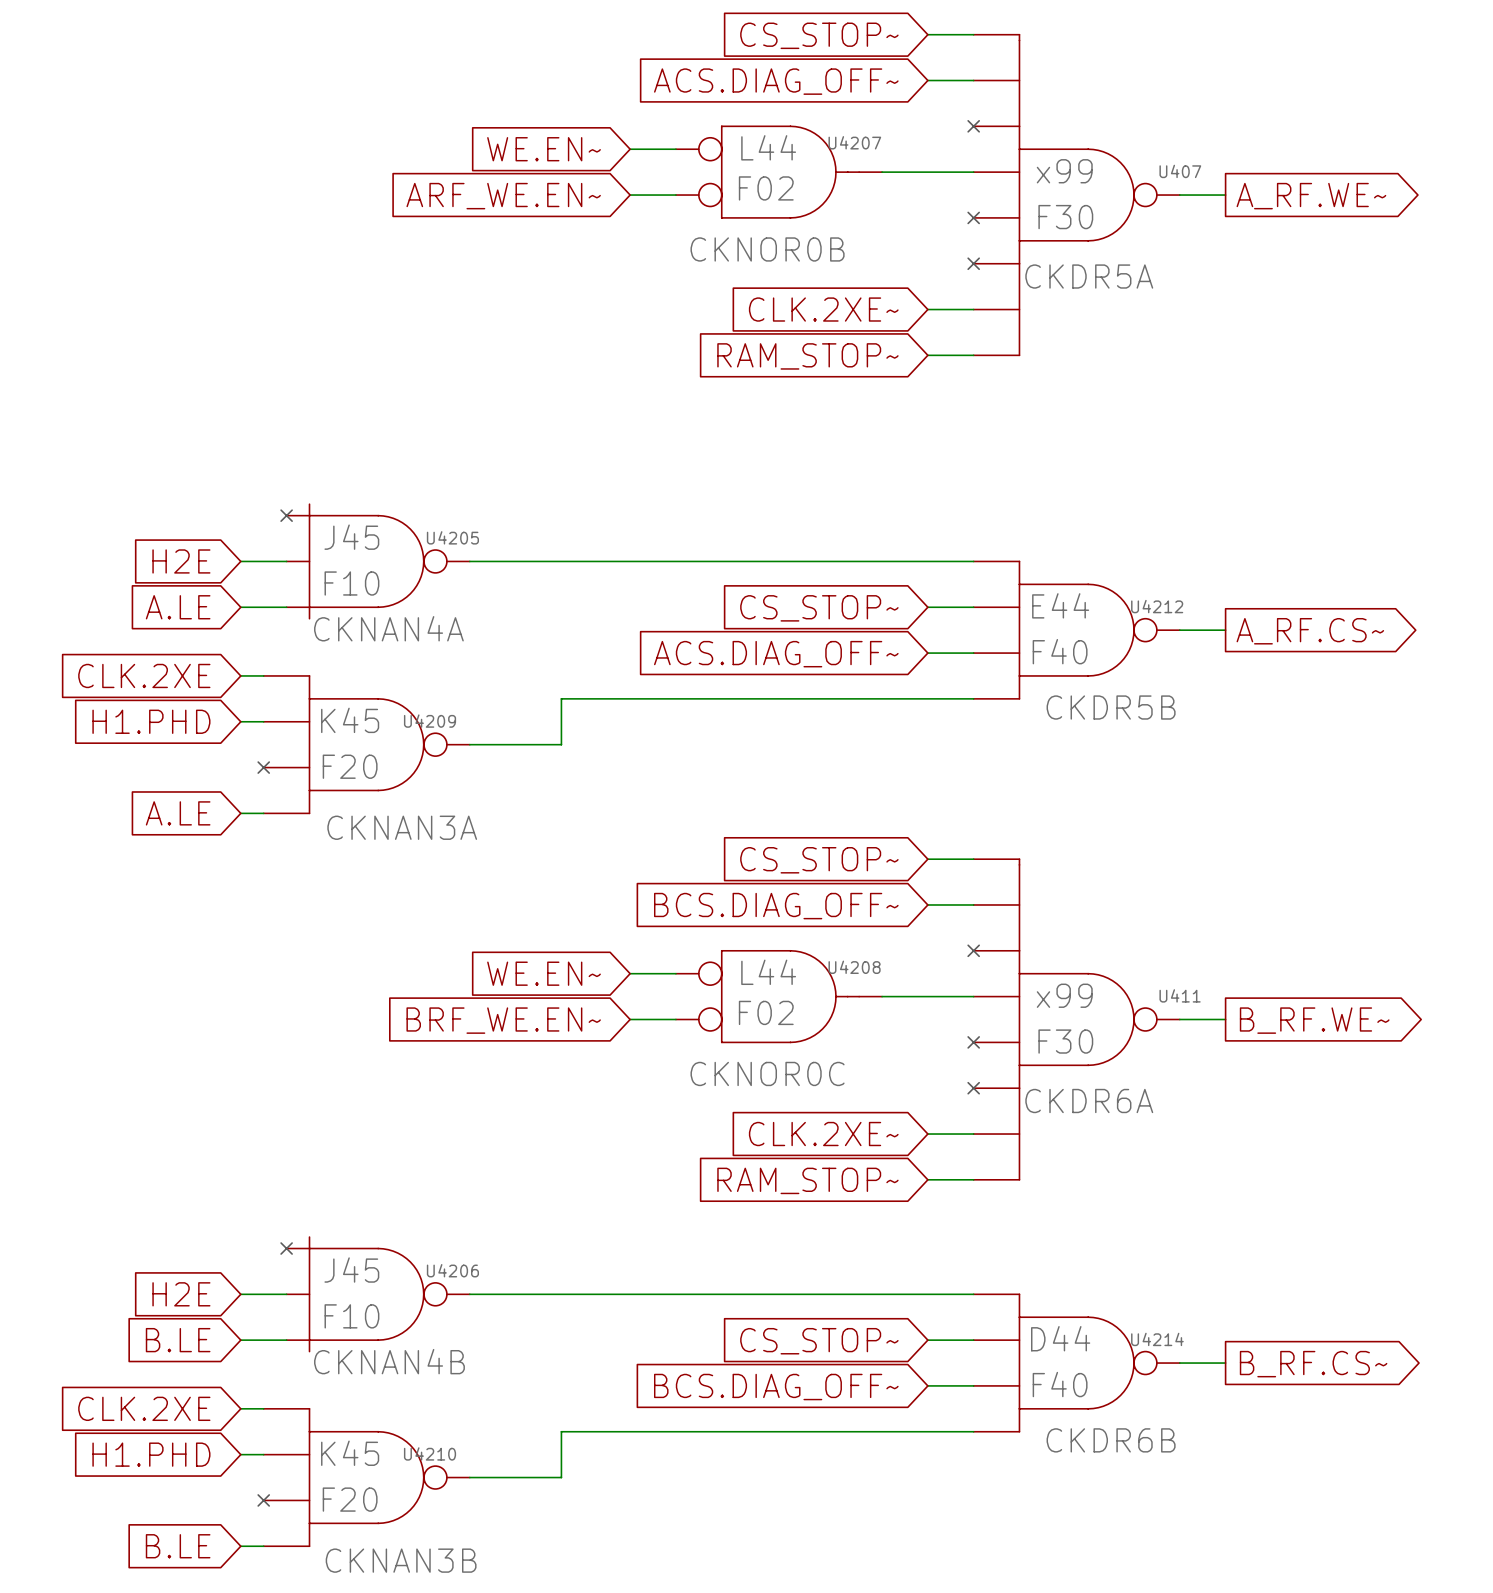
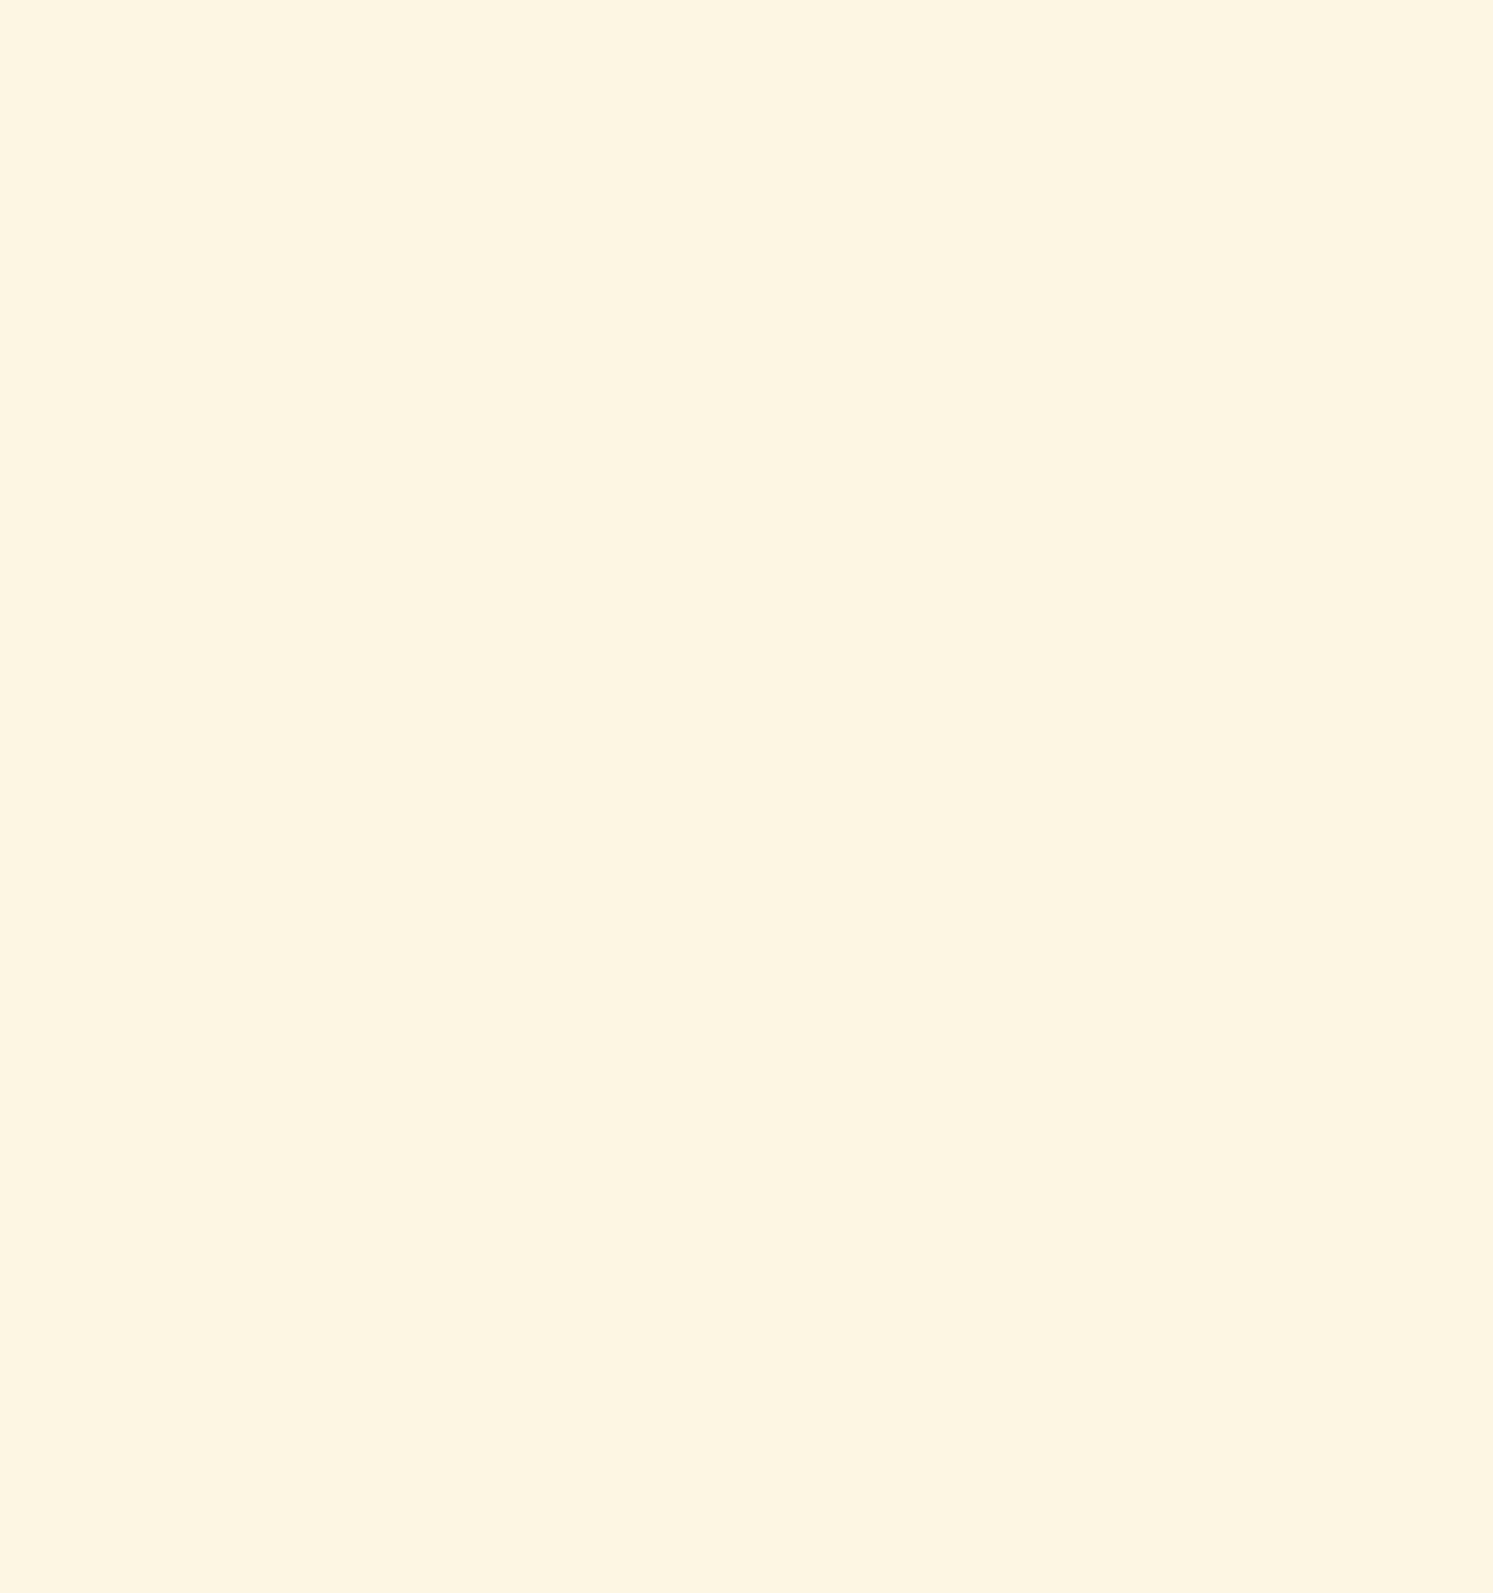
wire: (927, 34) (973, 34) -> none
global label: CS_STOP~ (819, 35) -> none
wire: (927, 80) (973, 80) -> none
global label: ACS.DIAG_OFF~ (776, 81) -> none
no-connect mark: (973, 126) -> none
global label: WE.EN~ (544, 149) -> none
wire: (630, 149) (675, 149) -> none
U4207: F02 (779, 172) -> none
wire: (882, 172) (973, 172) -> none
wire: (630, 195) (675, 195) -> none
U407: F30 (1076, 195) -> none
wire: (1179, 195) (1225, 195) -> none
global label: ARF_WE.EN~ (503, 196) -> none
global label: A_RF.WE~ (1311, 196) -> none
no-connect mark: (973, 217) -> none
no-connect mark: (973, 263) -> none
global label: CLK.2XE~ (823, 309) -> none
wire: (927, 309) (973, 309) -> none
wire: (927, 355) (973, 355) -> none
global label: RAM_STOP~ (807, 356) -> none
no-connect mark: (286, 515) -> none
global label: H2E (181, 561) -> none
wire: (240, 561) (286, 561) -> none
U4205: F10 (378, 561) -> none
wire: (469, 561) (973, 561) -> none
global label: A.LE (178, 607) -> none
wire: (240, 607) (286, 607) -> none
wire: (927, 607) (973, 607) -> none
global label: CS_STOP~ (819, 608) -> none
U4212: F40 (1076, 630) -> none
wire: (1179, 630) (1225, 630) -> none
global label: A_RF.CS~ (1310, 631) -> none
wire: (927, 653) (973, 653) -> none
global label: ACS.DIAG_OFF~ (776, 654) -> none
global label: CLK.2XE (144, 675) -> none
wire: (240, 675) (263, 675) -> none
wire: (973, 698) (561, 698) (561, 744) (469, 744) -> none
global label: H1.PHD (151, 721) -> none
wire: (240, 721) (263, 721) -> none
U4209: F20 (366, 744) -> none
no-connect mark: (263, 767) -> none
global label: A.LE (178, 813) -> none
wire: (240, 813) (263, 813) -> none
wire: (927, 859) (973, 859) -> none
global label: CS_STOP~ (819, 860) -> none
wire: (927, 904) (973, 904) -> none
global label: BCS.DIAG_OFF~ (776, 906) -> none
no-connect mark: (973, 950) -> none
global label: WE.EN~ (544, 973) -> none
wire: (630, 973) (675, 973) -> none
U4208: F02 (779, 996) -> none
wire: (882, 996) (973, 996) -> none
wire: (630, 1019) (675, 1019) -> none
U411: F30 (1076, 1019) -> none
wire: (1179, 1019) (1225, 1019) -> none
global label: BRF_WE.EN~ (503, 1020) -> none
global label: B_RF.WE~ (1314, 1020) -> none
no-connect mark: (973, 1042) -> none
no-connect mark: (973, 1088) -> none
global label: CLK.2XE~ (823, 1134) -> none
wire: (927, 1134) (973, 1134) -> none
wire: (927, 1179) (973, 1179) -> none
global label: RAM_STOP~ (807, 1180) -> none
no-connect mark: (286, 1248) -> none
global label: H2E (181, 1294) -> none
wire: (240, 1294) (286, 1294) -> none
U4206: F10 (378, 1294) -> none
wire: (469, 1294) (973, 1294) -> none
global label: B.LE (178, 1340) -> none
wire: (240, 1340) (286, 1340) -> none
wire: (927, 1340) (973, 1340) -> none
global label: CS_STOP~ (819, 1341) -> none
U4214: F40 (1076, 1363) -> none
wire: (1179, 1363) (1225, 1363) -> none
global label: B_RF.CS~ (1313, 1364) -> none
wire: (927, 1385) (973, 1385) -> none
global label: BCS.DIAG_OFF~ (776, 1387) -> none
global label: CLK.2XE (144, 1408) -> none
wire: (240, 1408) (263, 1408) -> none
wire: (973, 1431) (561, 1431) (561, 1477) (469, 1477) -> none
global label: H1.PHD (151, 1454) -> none
wire: (240, 1454) (263, 1454) -> none
U4210: F20 (366, 1477) -> none
no-connect mark: (263, 1500) -> none
global label: B.LE (178, 1546) -> none
wire: (240, 1546) (263, 1546) -> none

